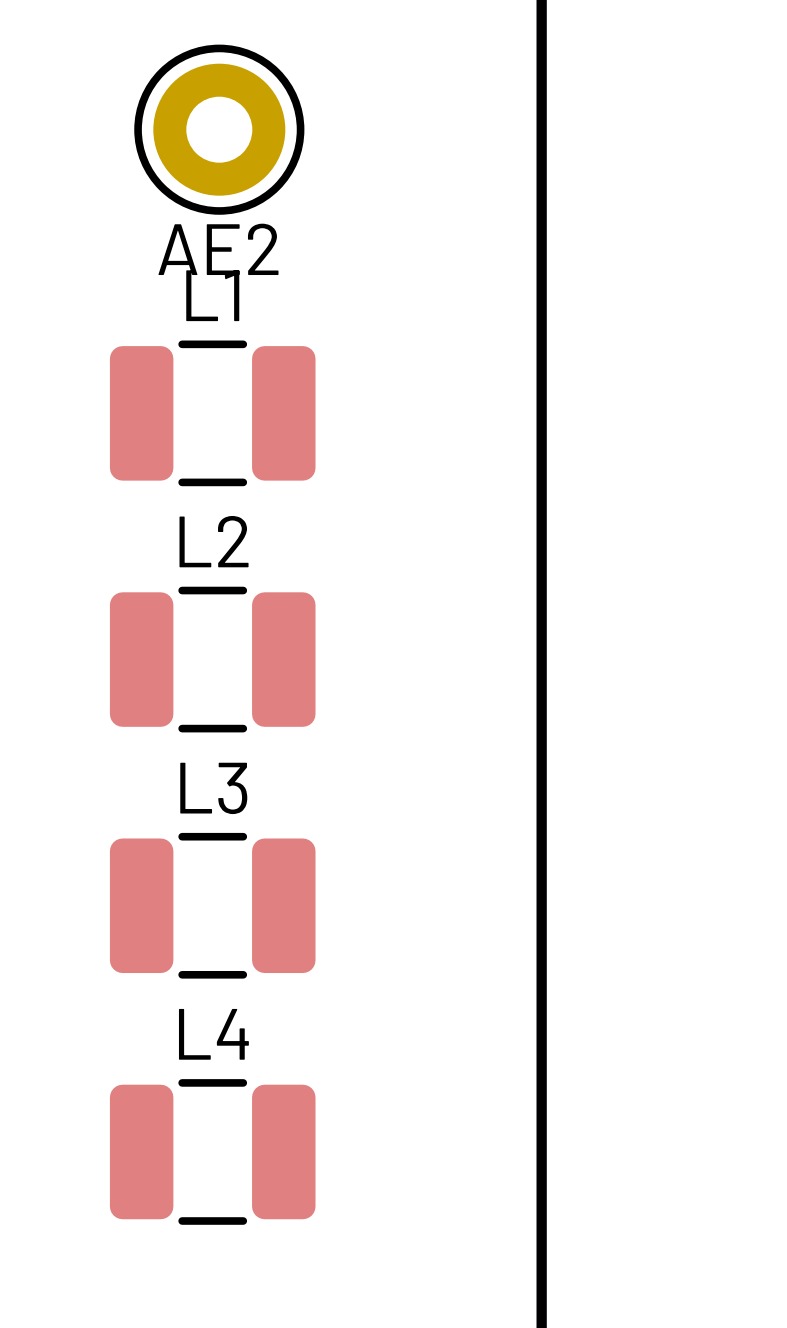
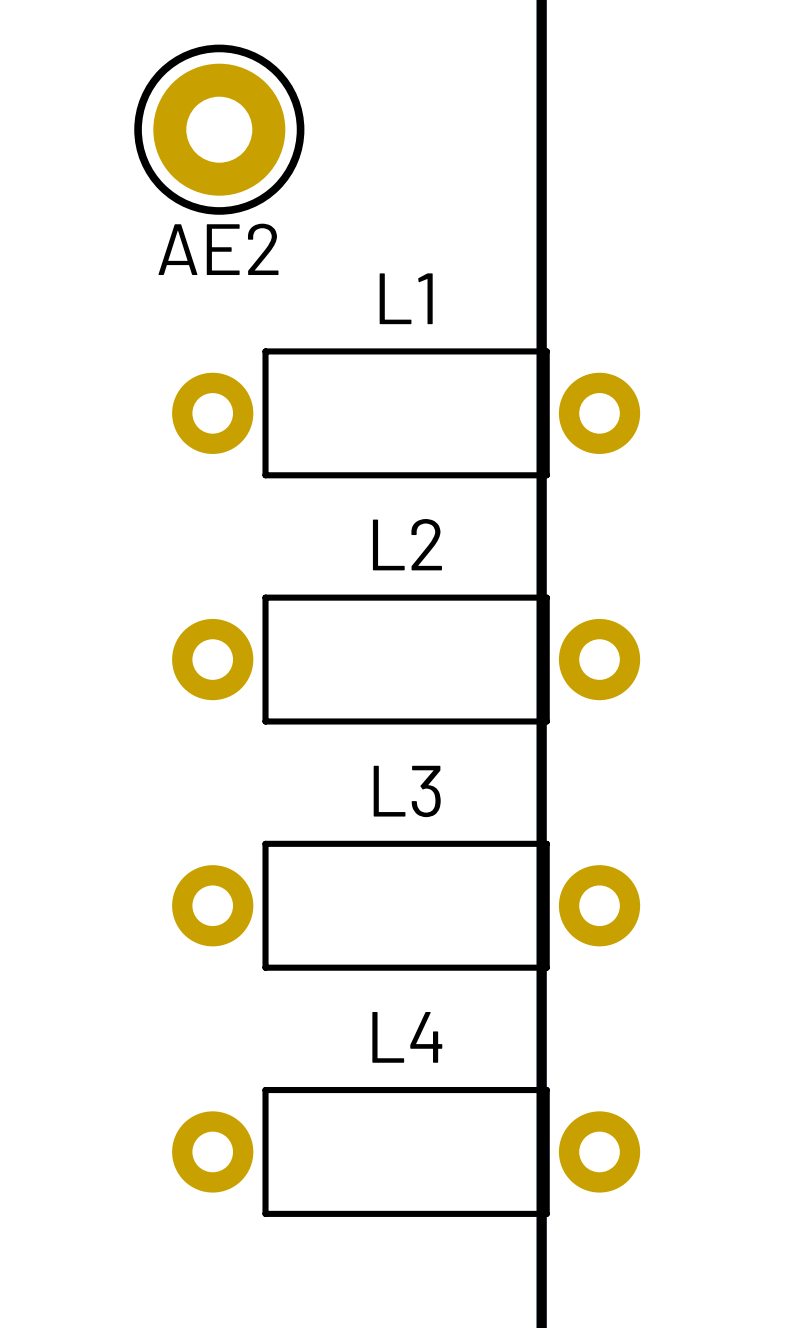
L1 footprint: [109, 340, 316, 487] -> [172, 348, 641, 479]
L2 footprint: [109, 586, 316, 733] -> [172, 594, 641, 725]
L3 footprint: [109, 832, 316, 979] -> [172, 840, 641, 971]
L4 footprint: [109, 1079, 316, 1225] -> [172, 1086, 641, 1217]

